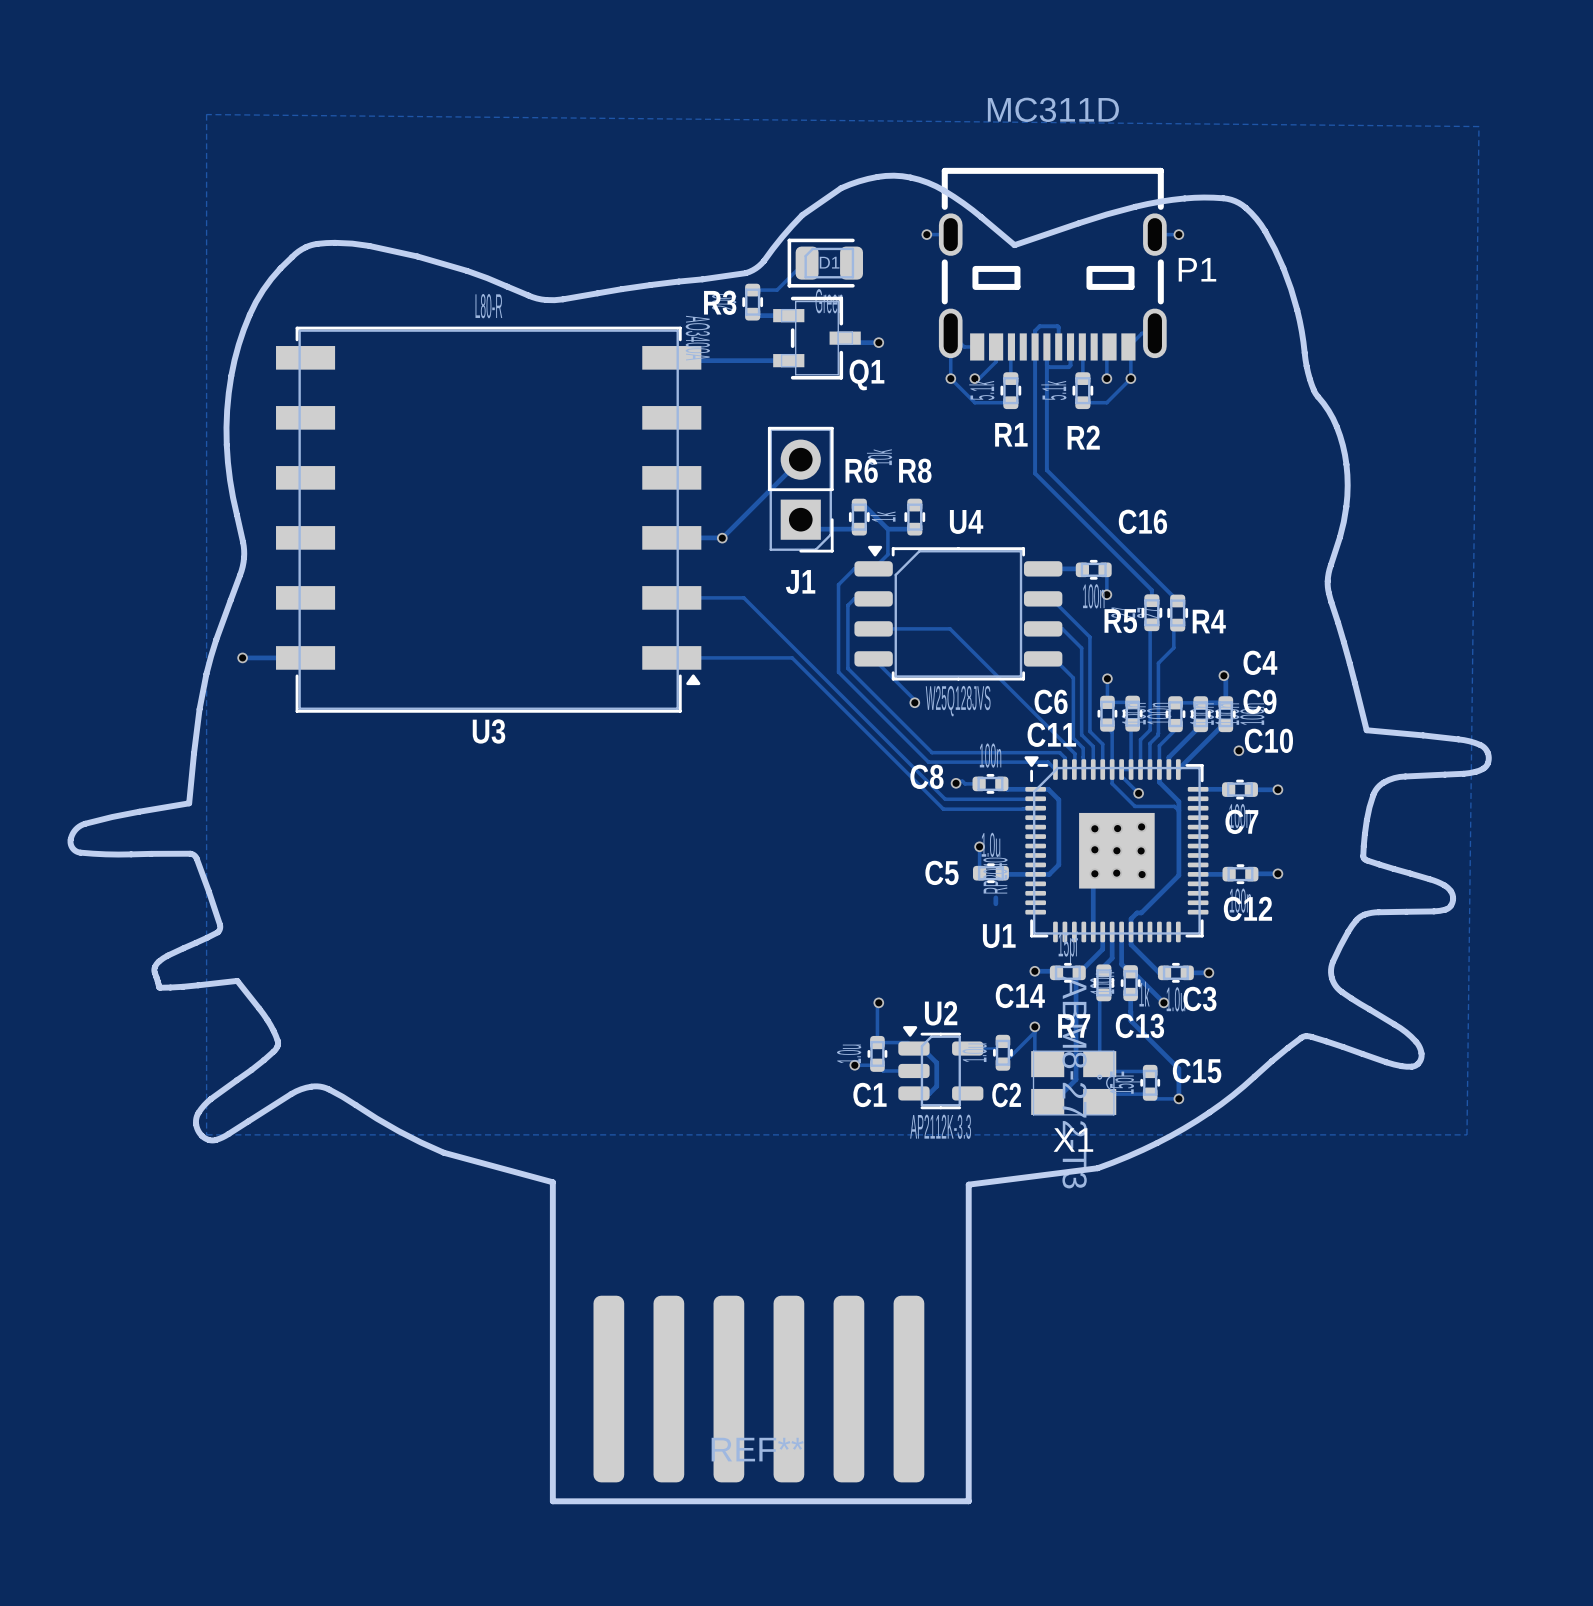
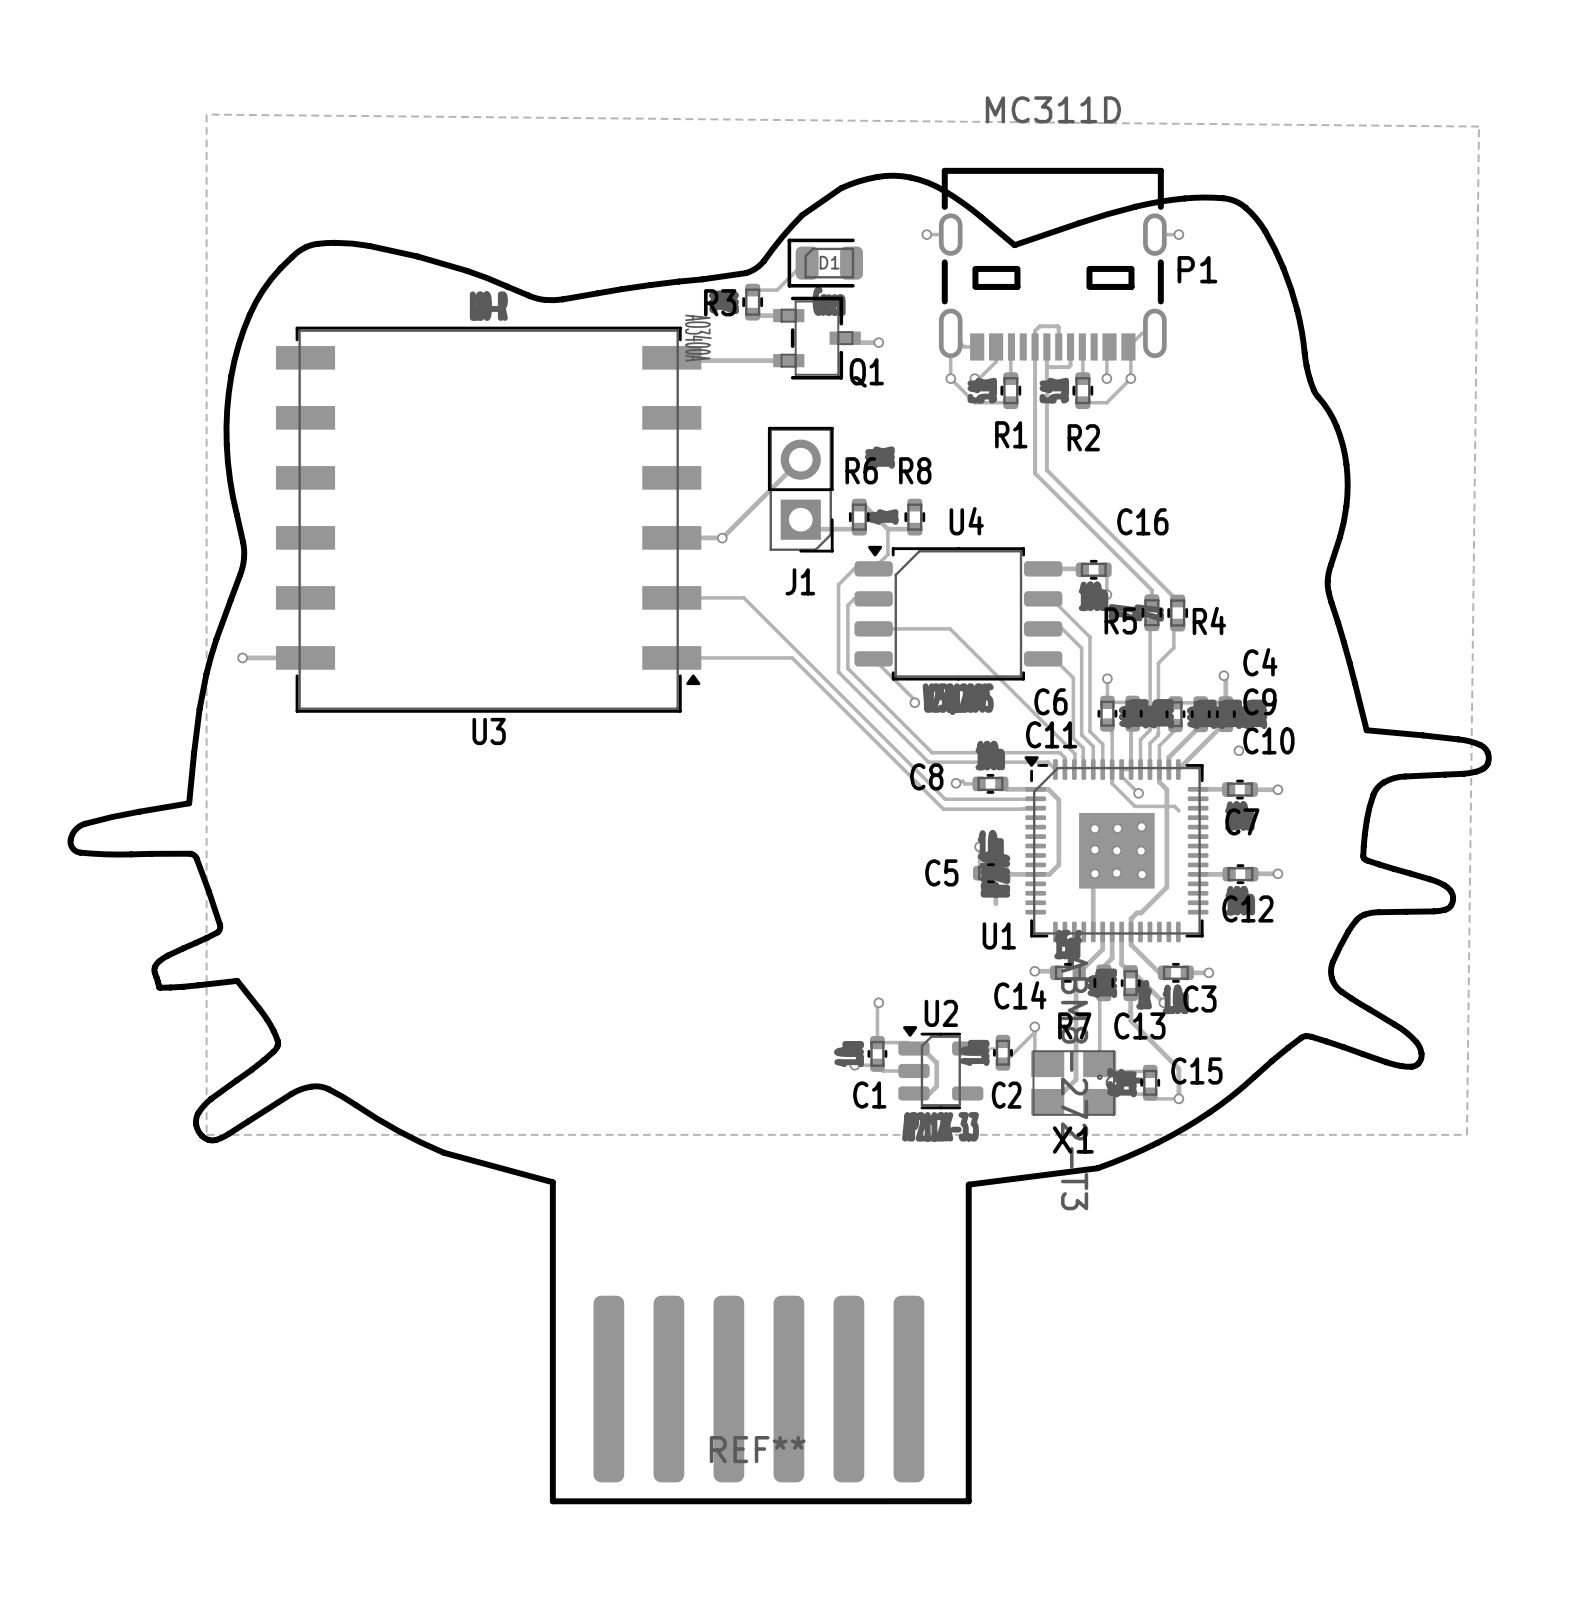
track: (1166, 789) (1178, 801) (1178, 875) (1141, 912) -> (1166, 789) (1166, 887) (1141, 912)

